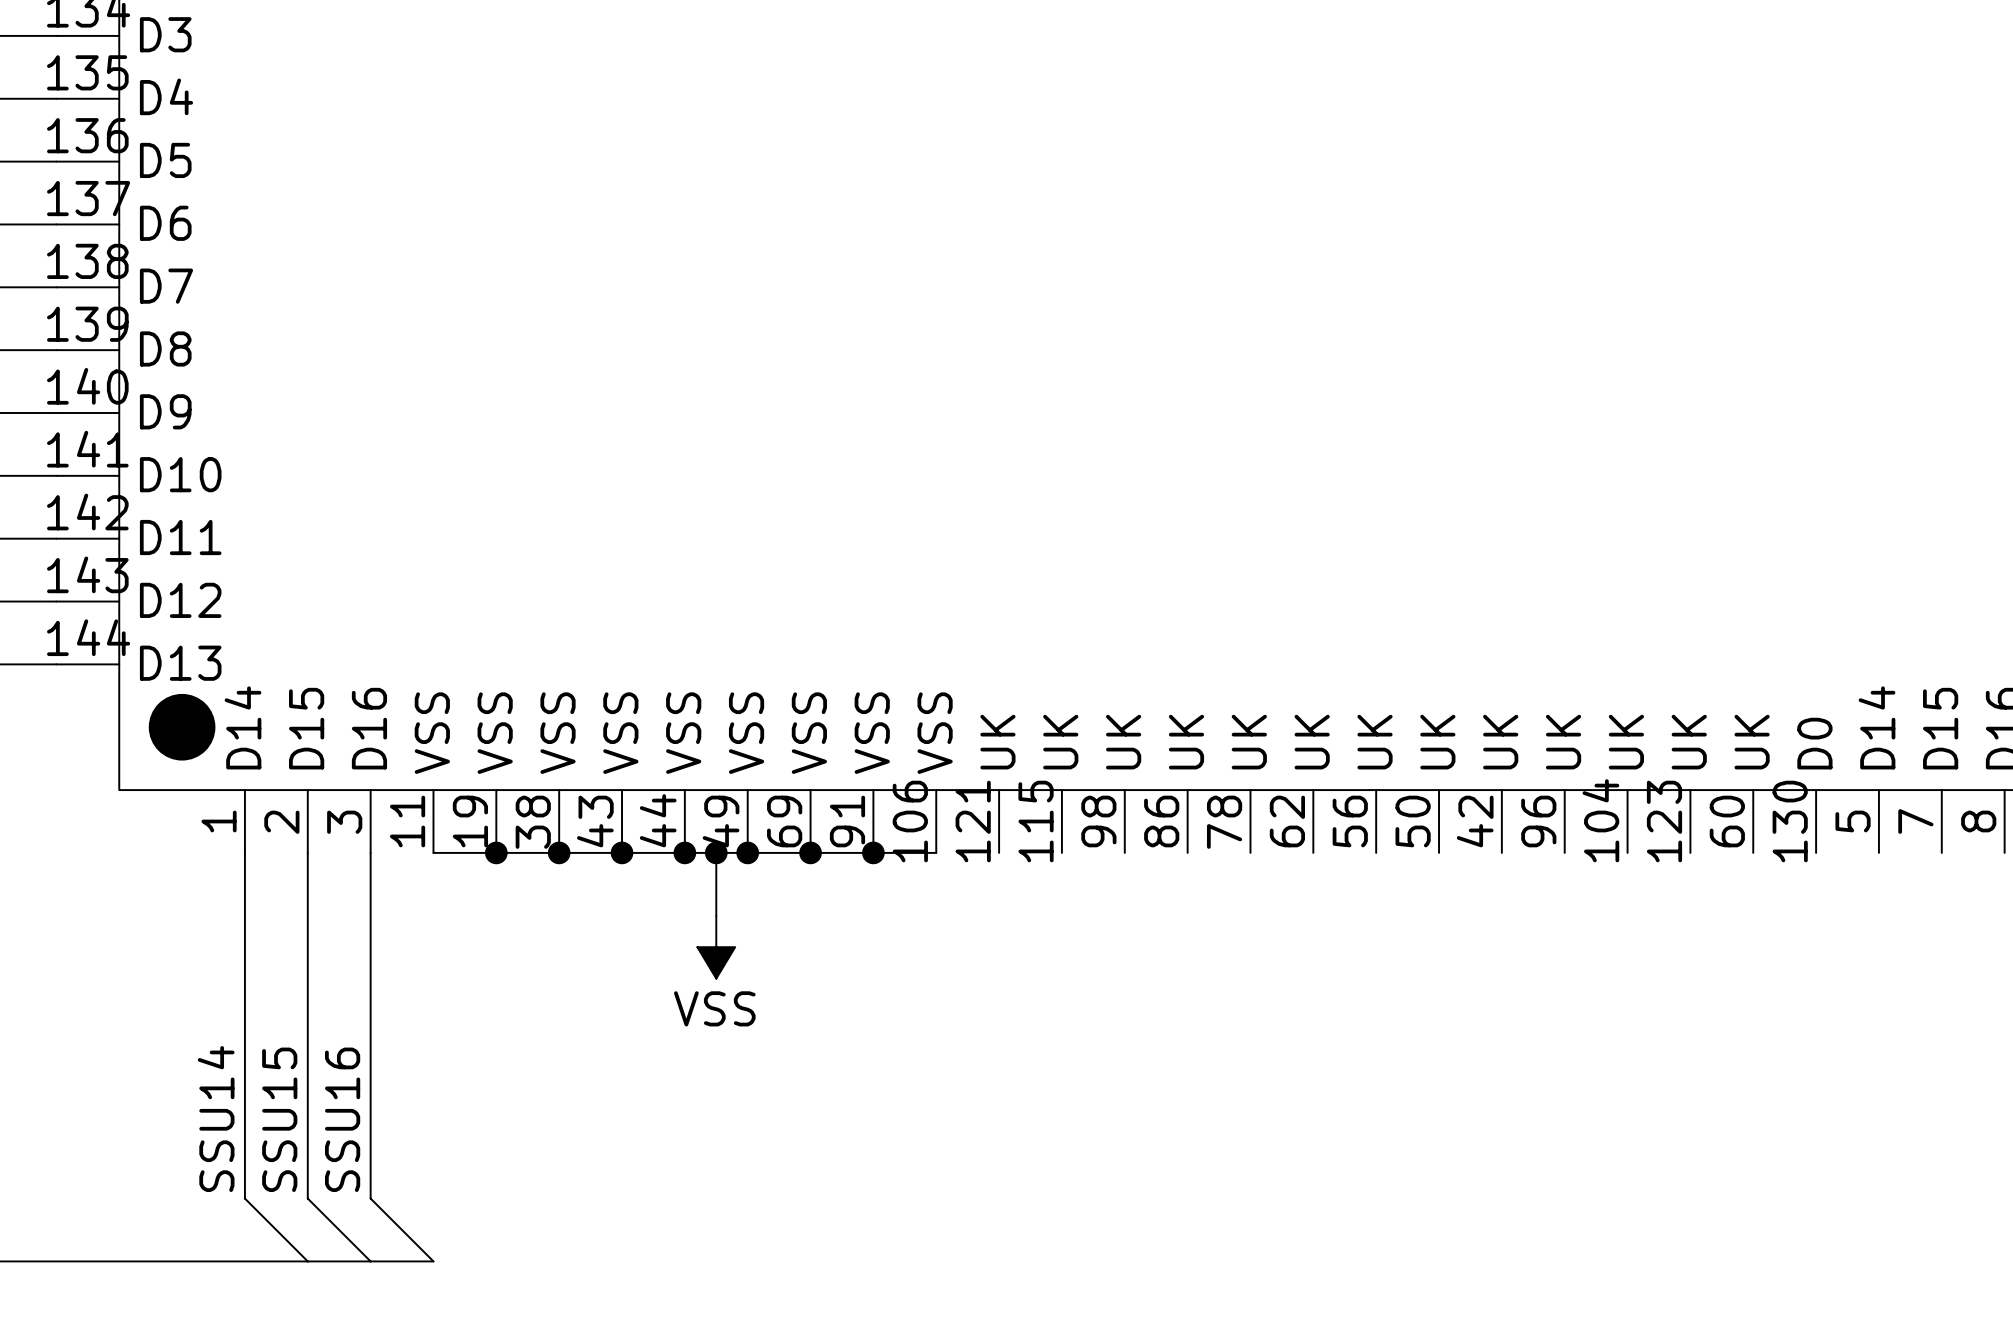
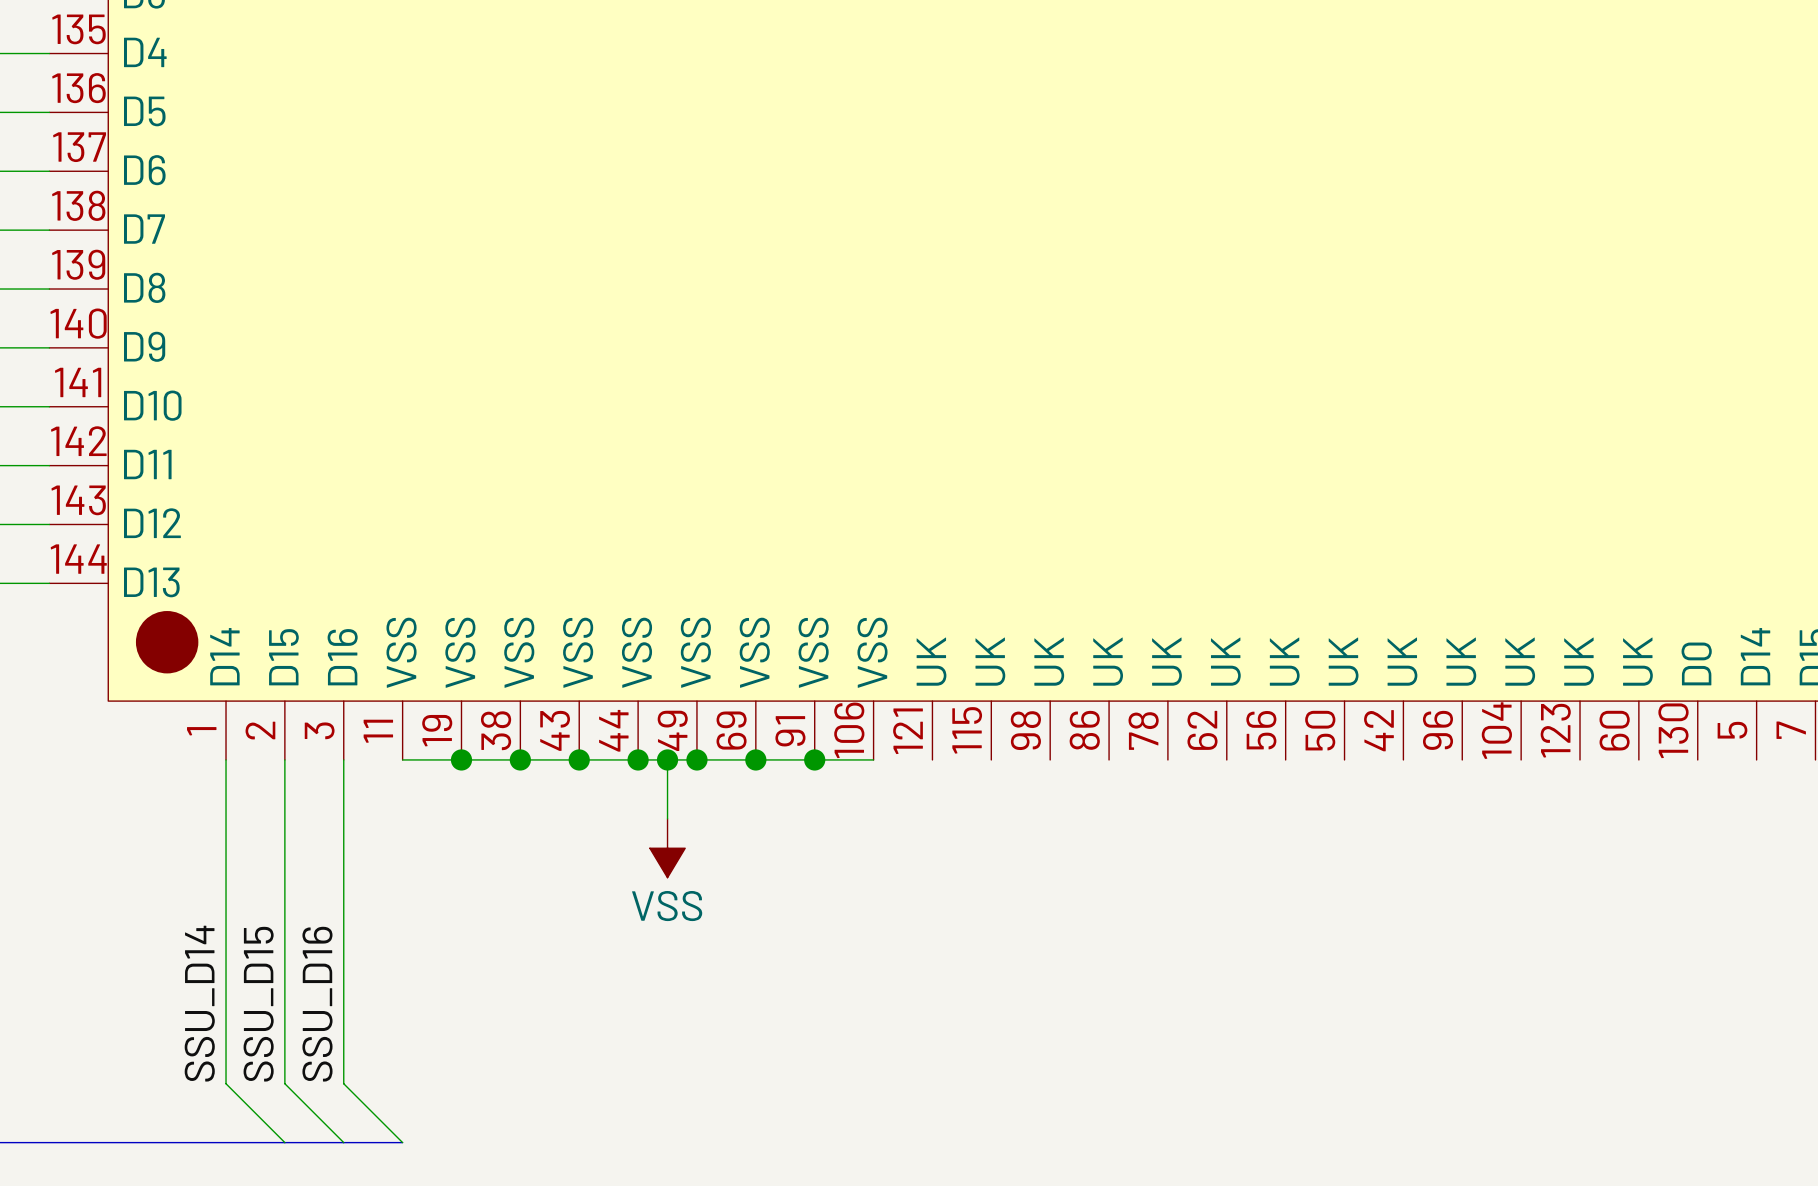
label: SSU14 (216, 1119) -> SSU_D14 (199, 1003)
label: SSU15 (279, 1119) -> SSU_D15 (258, 1004)
label: SSU16 (342, 1119) -> SSU_D16 (317, 1004)

